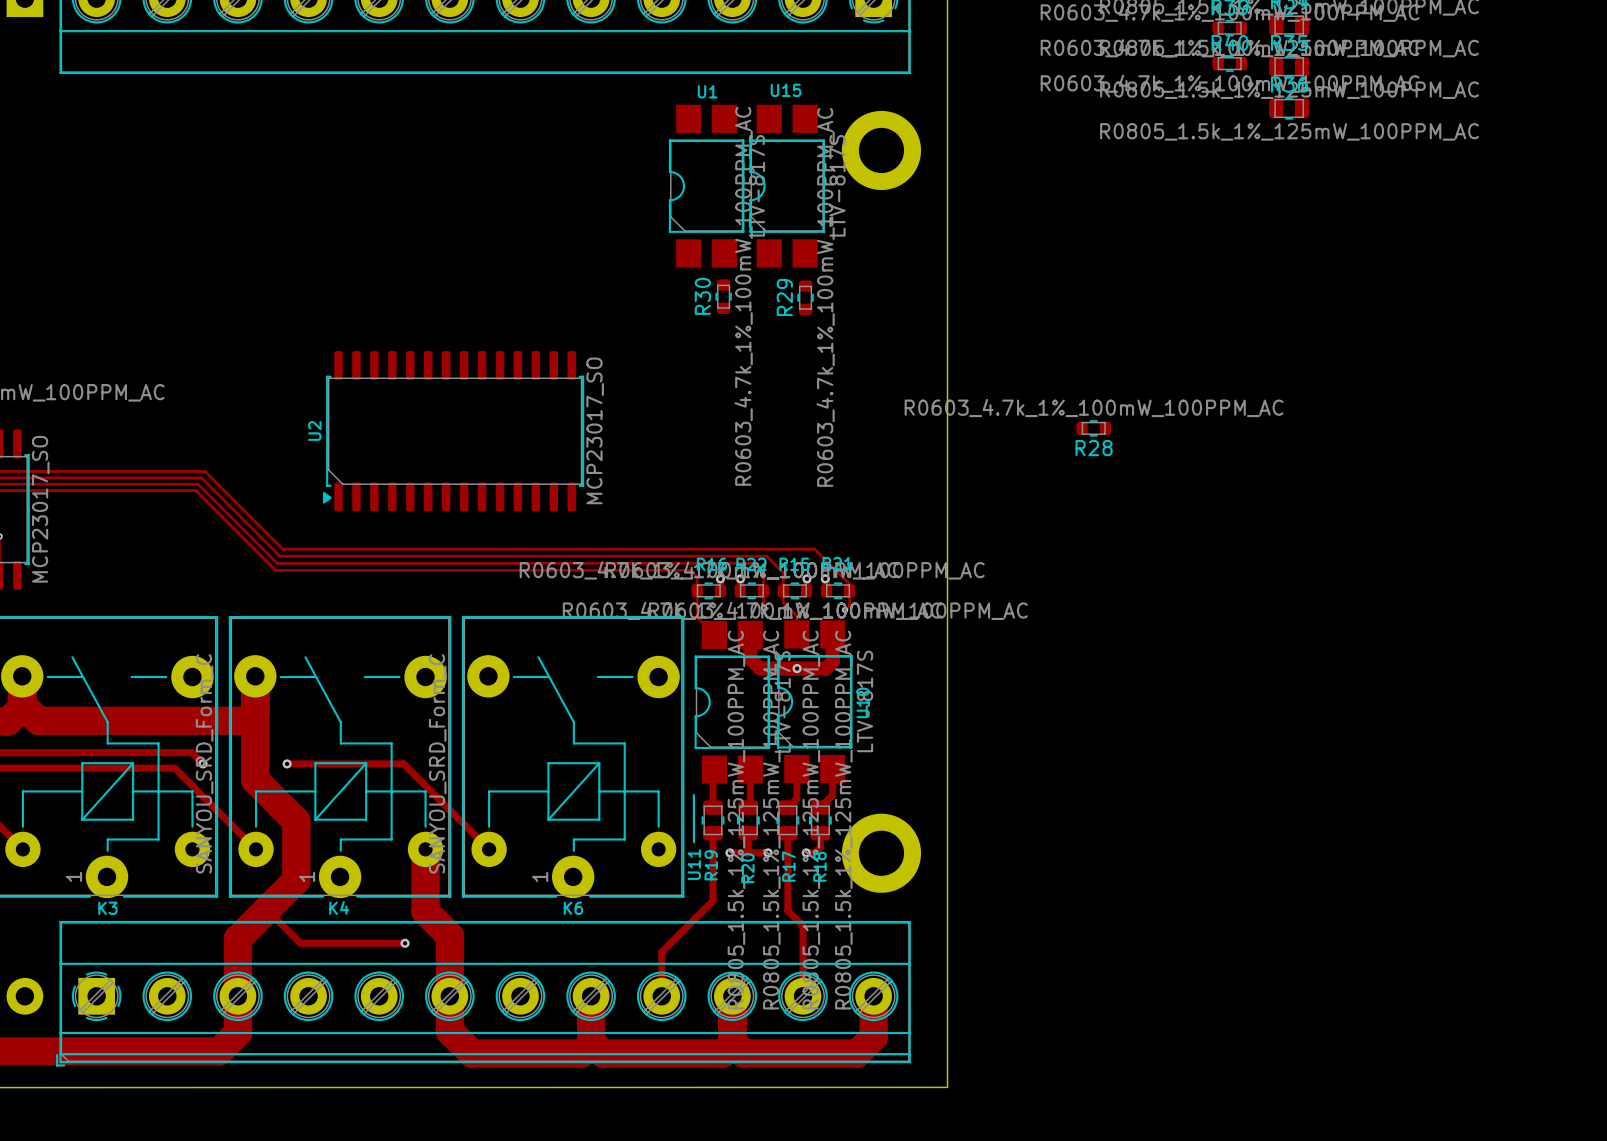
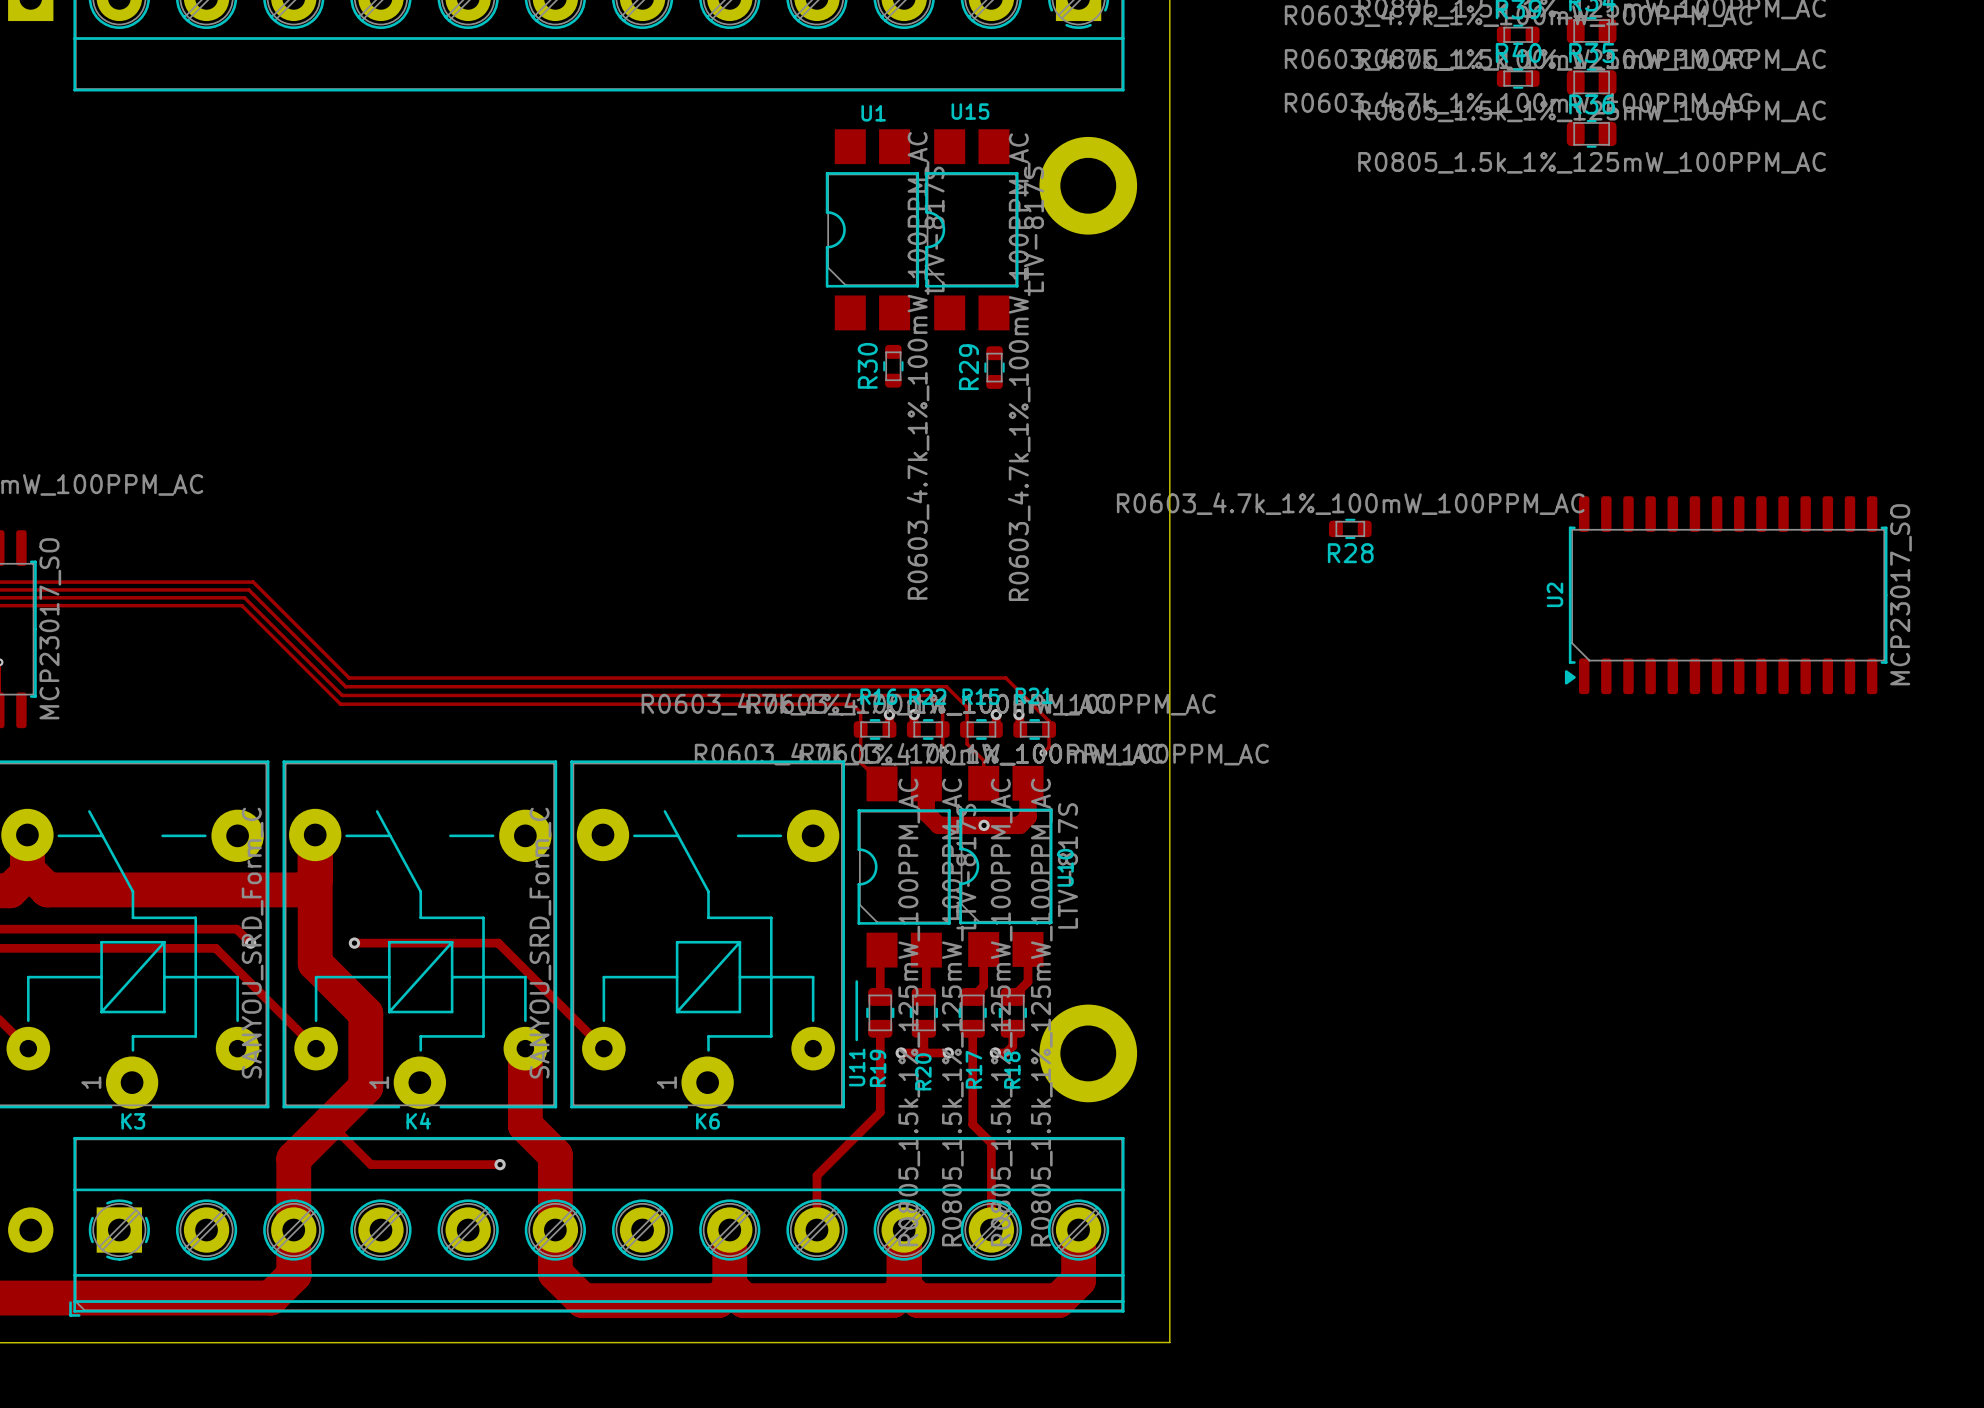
U2 position: (453, 431) -> (1726, 595)

